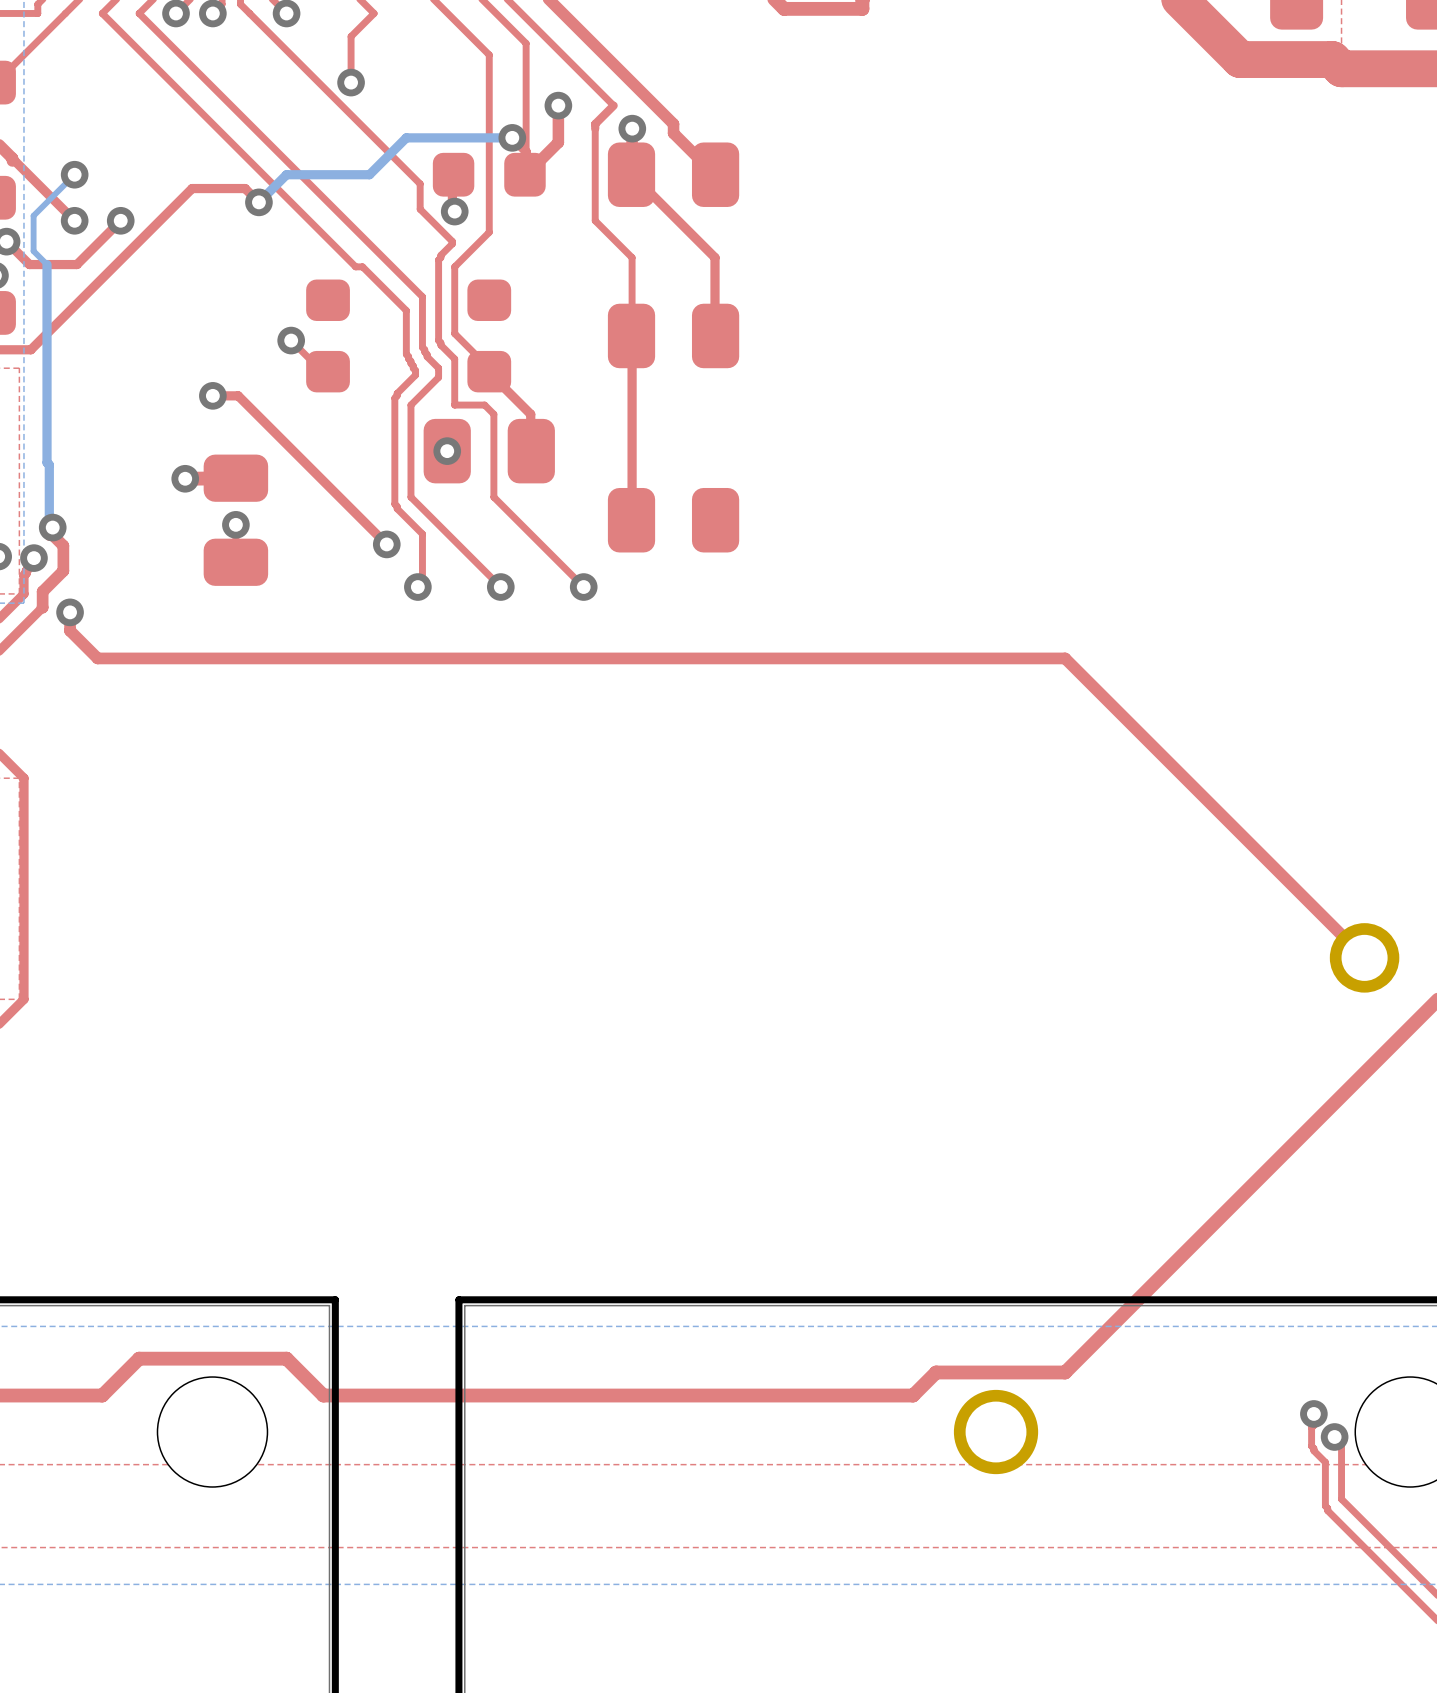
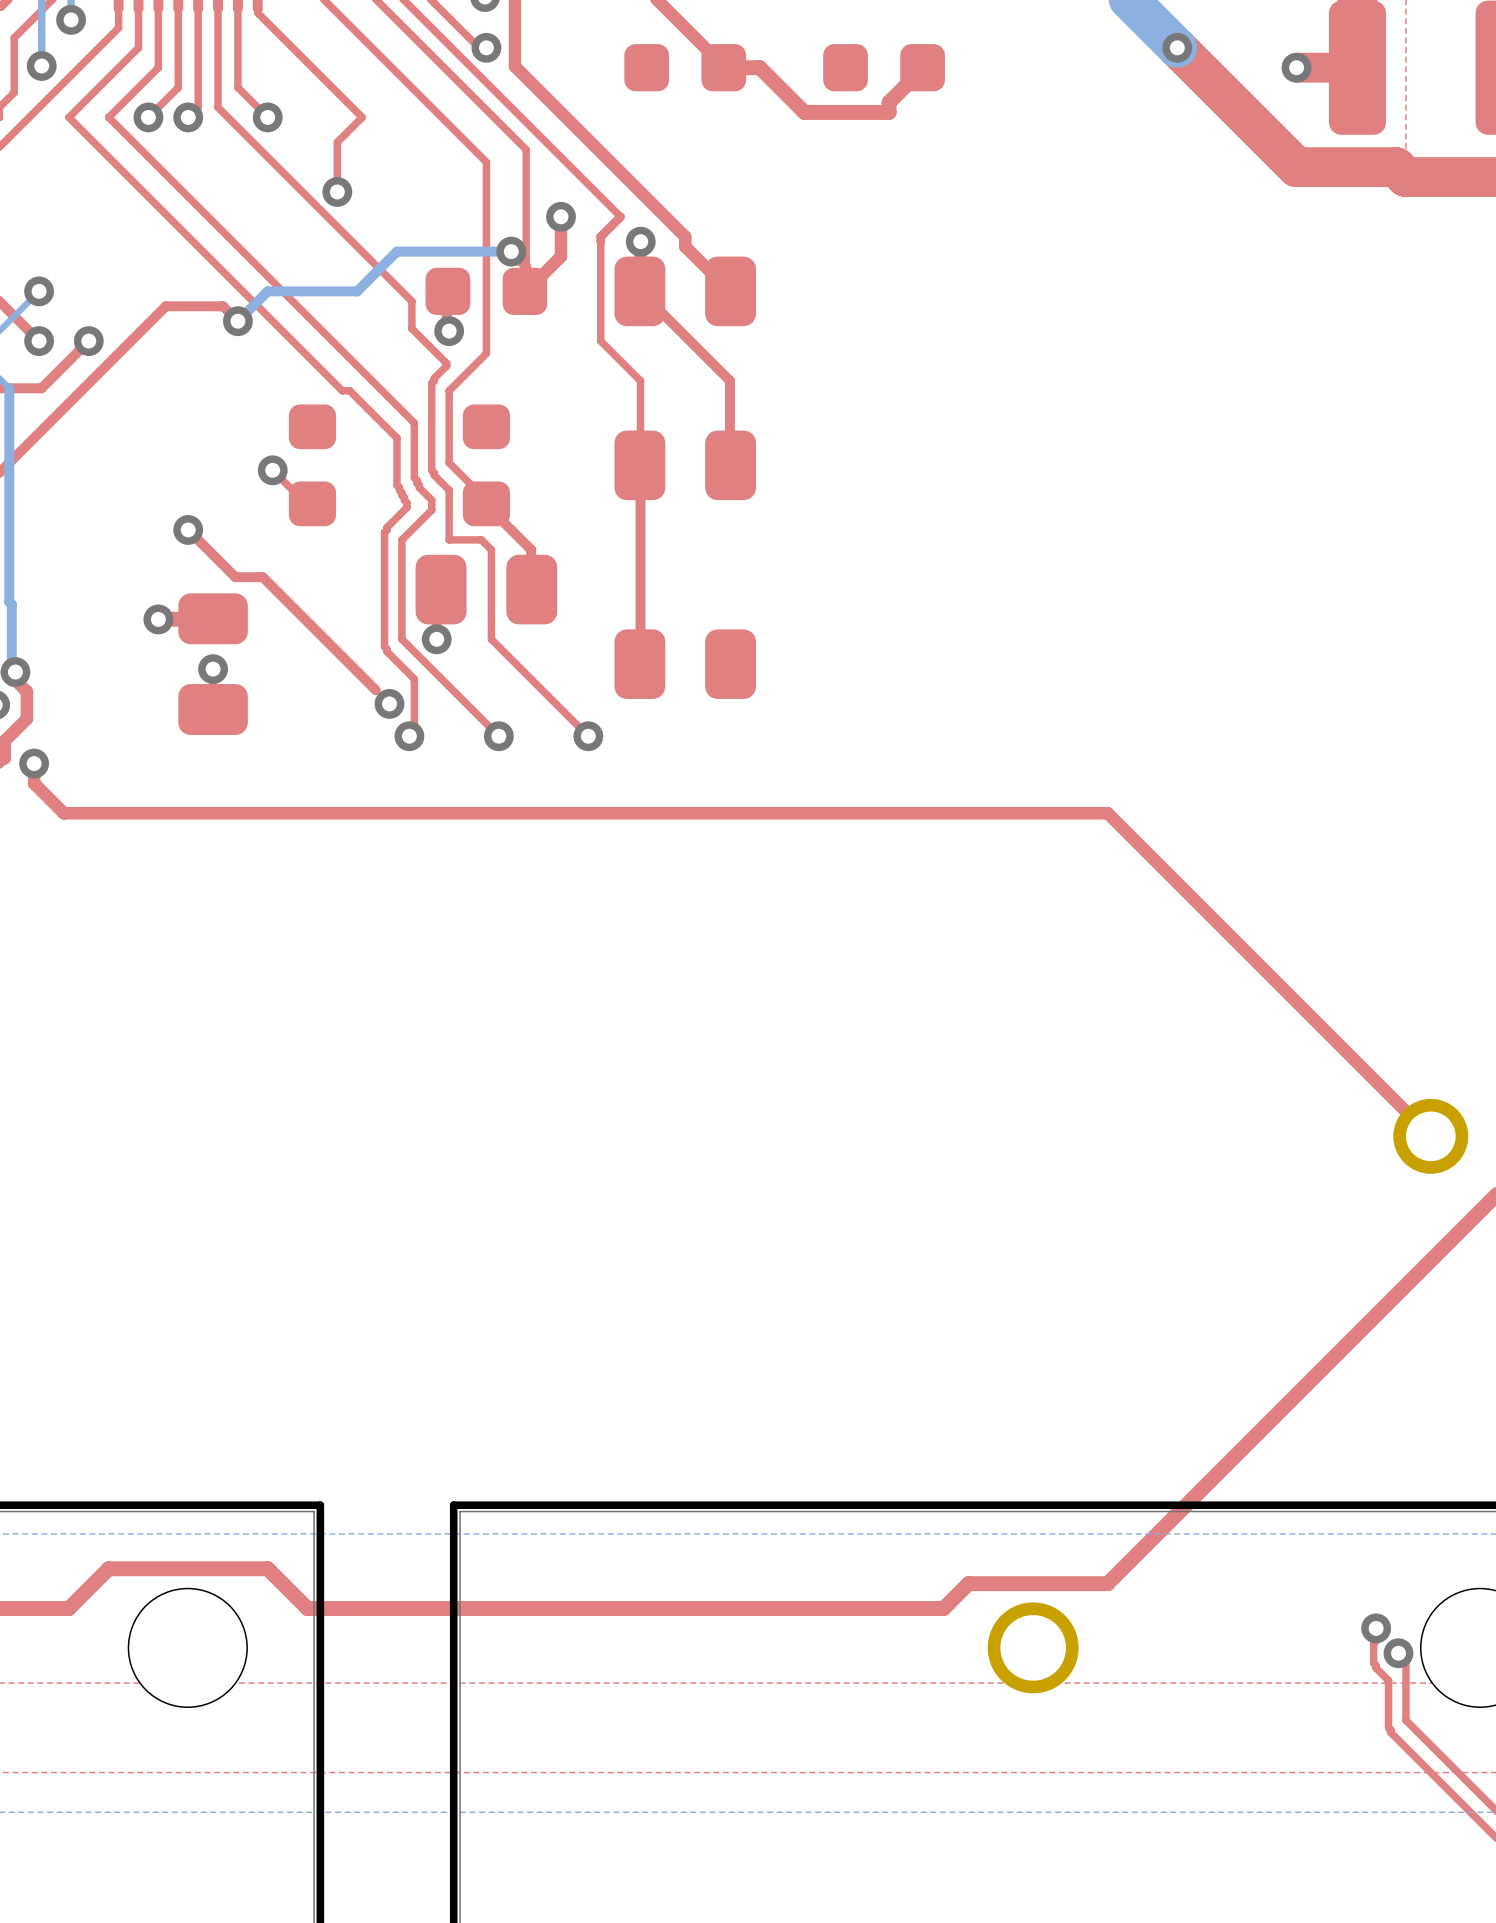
top track: (212, 395) (238, 395) (281, 439) -> (188, 529) (235, 577) (262, 577)
via: (447, 451) -> none
via: none -> (436, 639)
via position: (386, 544) -> (389, 703)

